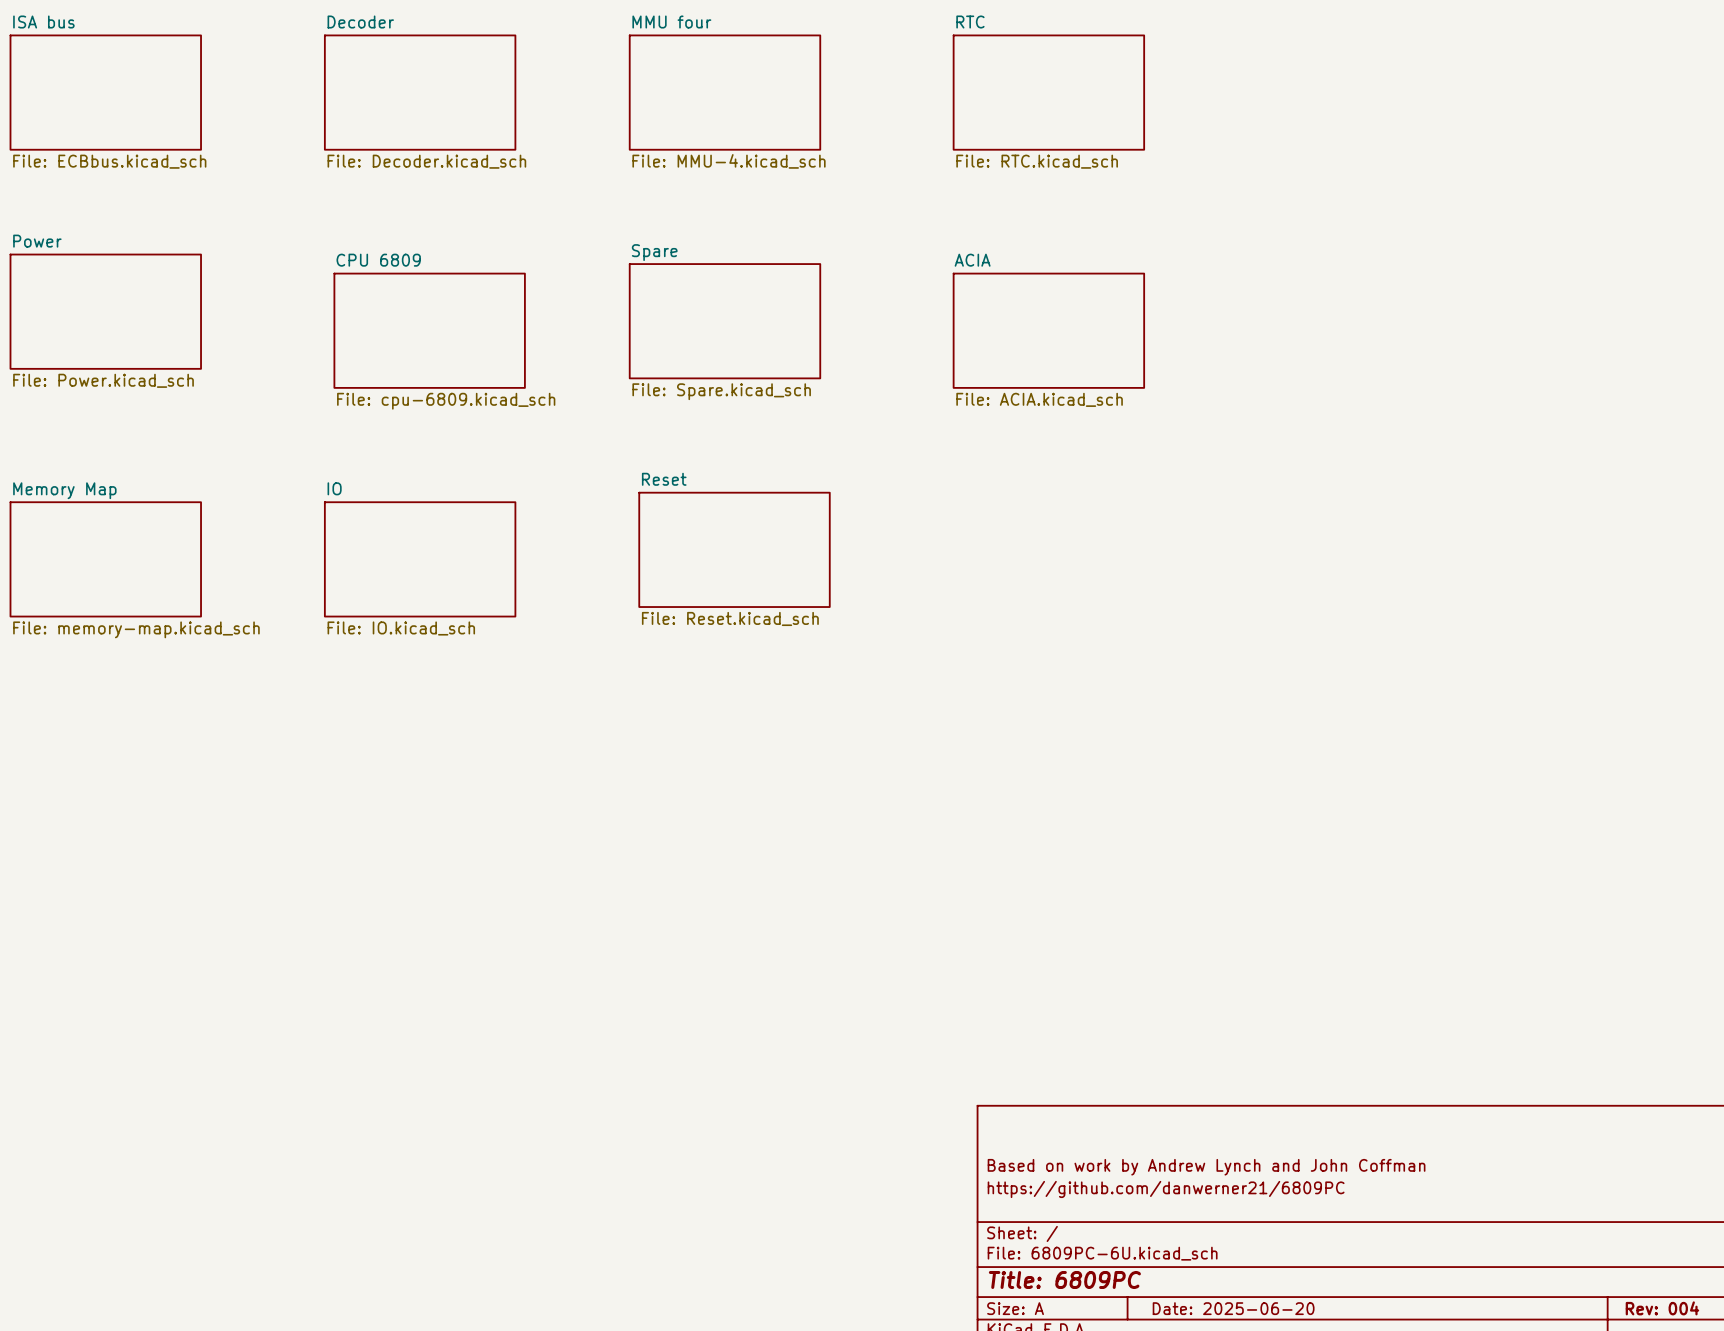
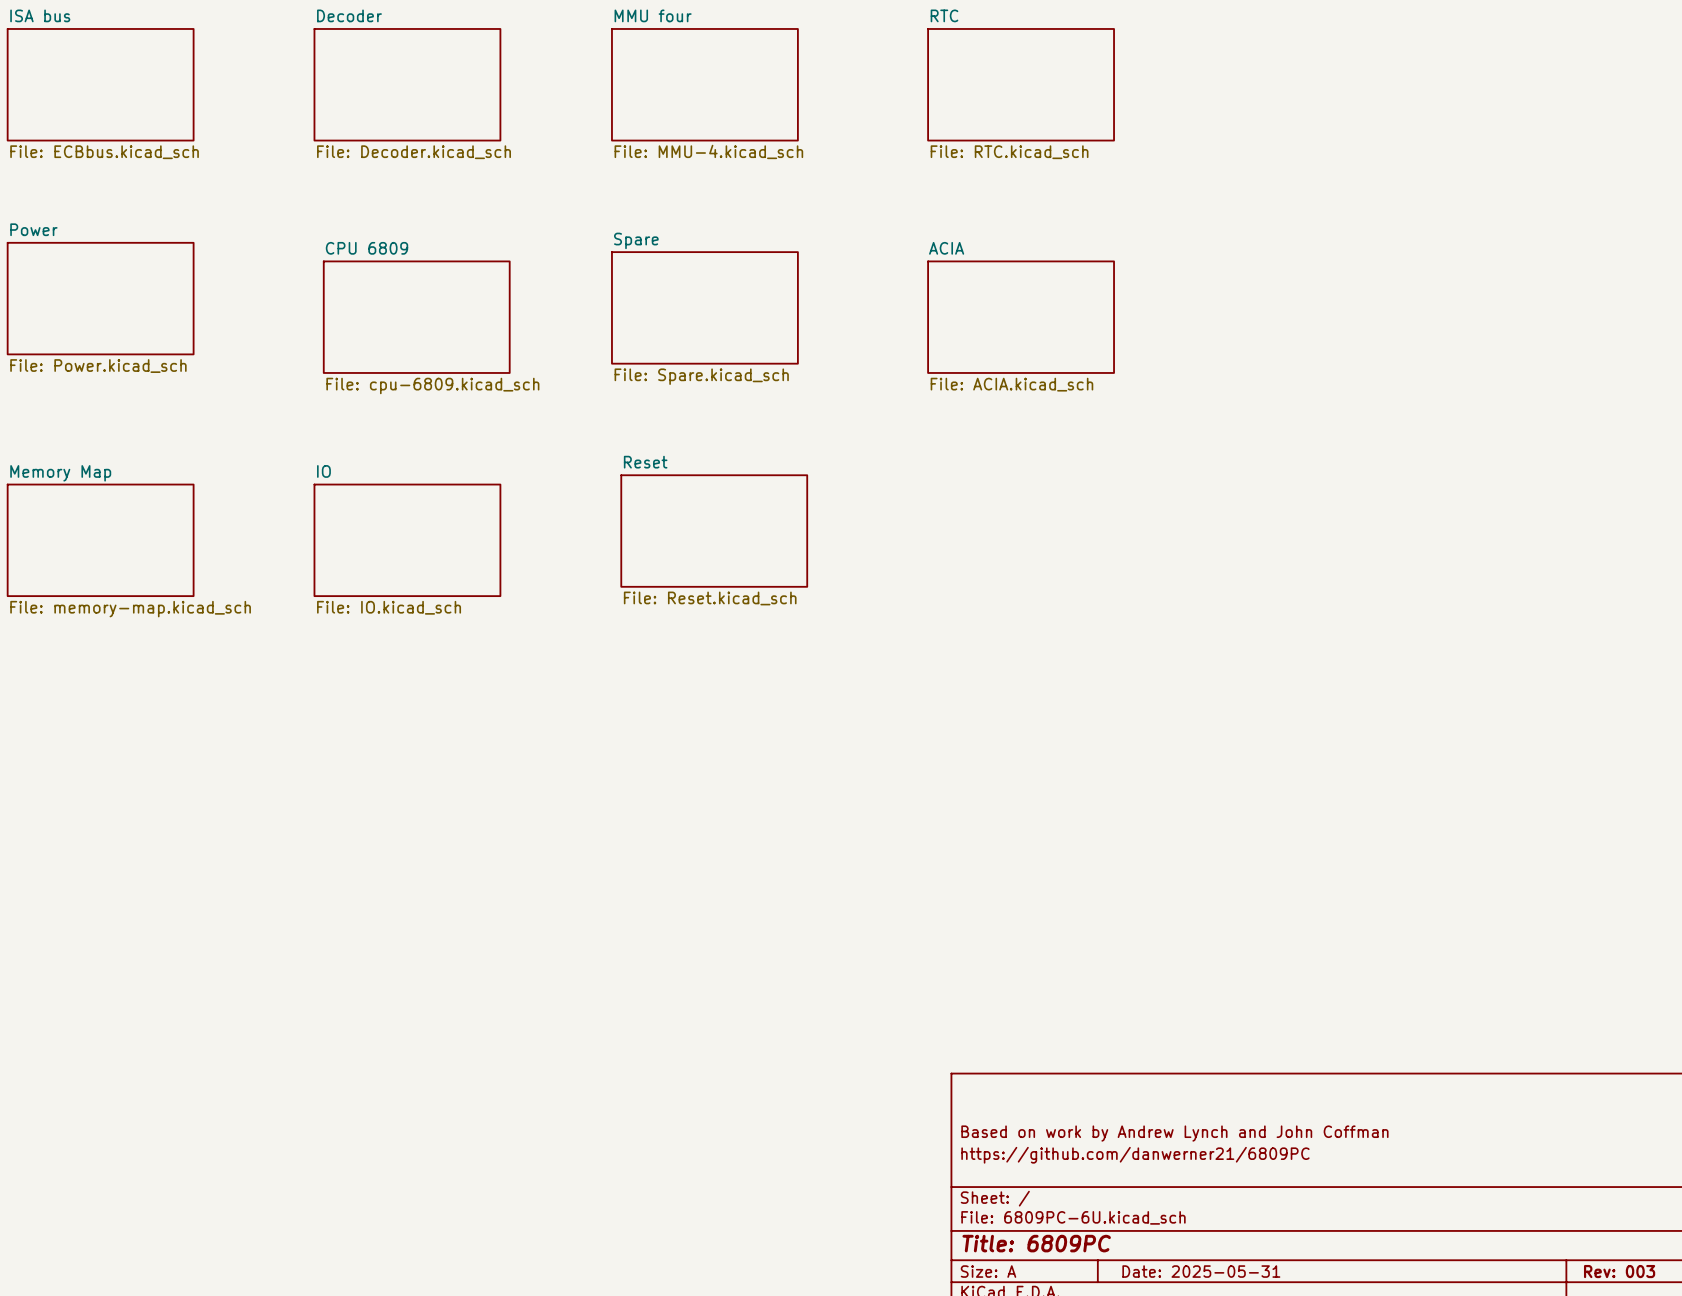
title block: Date: 2025-06-20 (1233, 1308) -> Date: 2025-05-31 (1201, 1271)
title block: Rev: 004 (1662, 1308) -> Rev: 003 (1619, 1271)

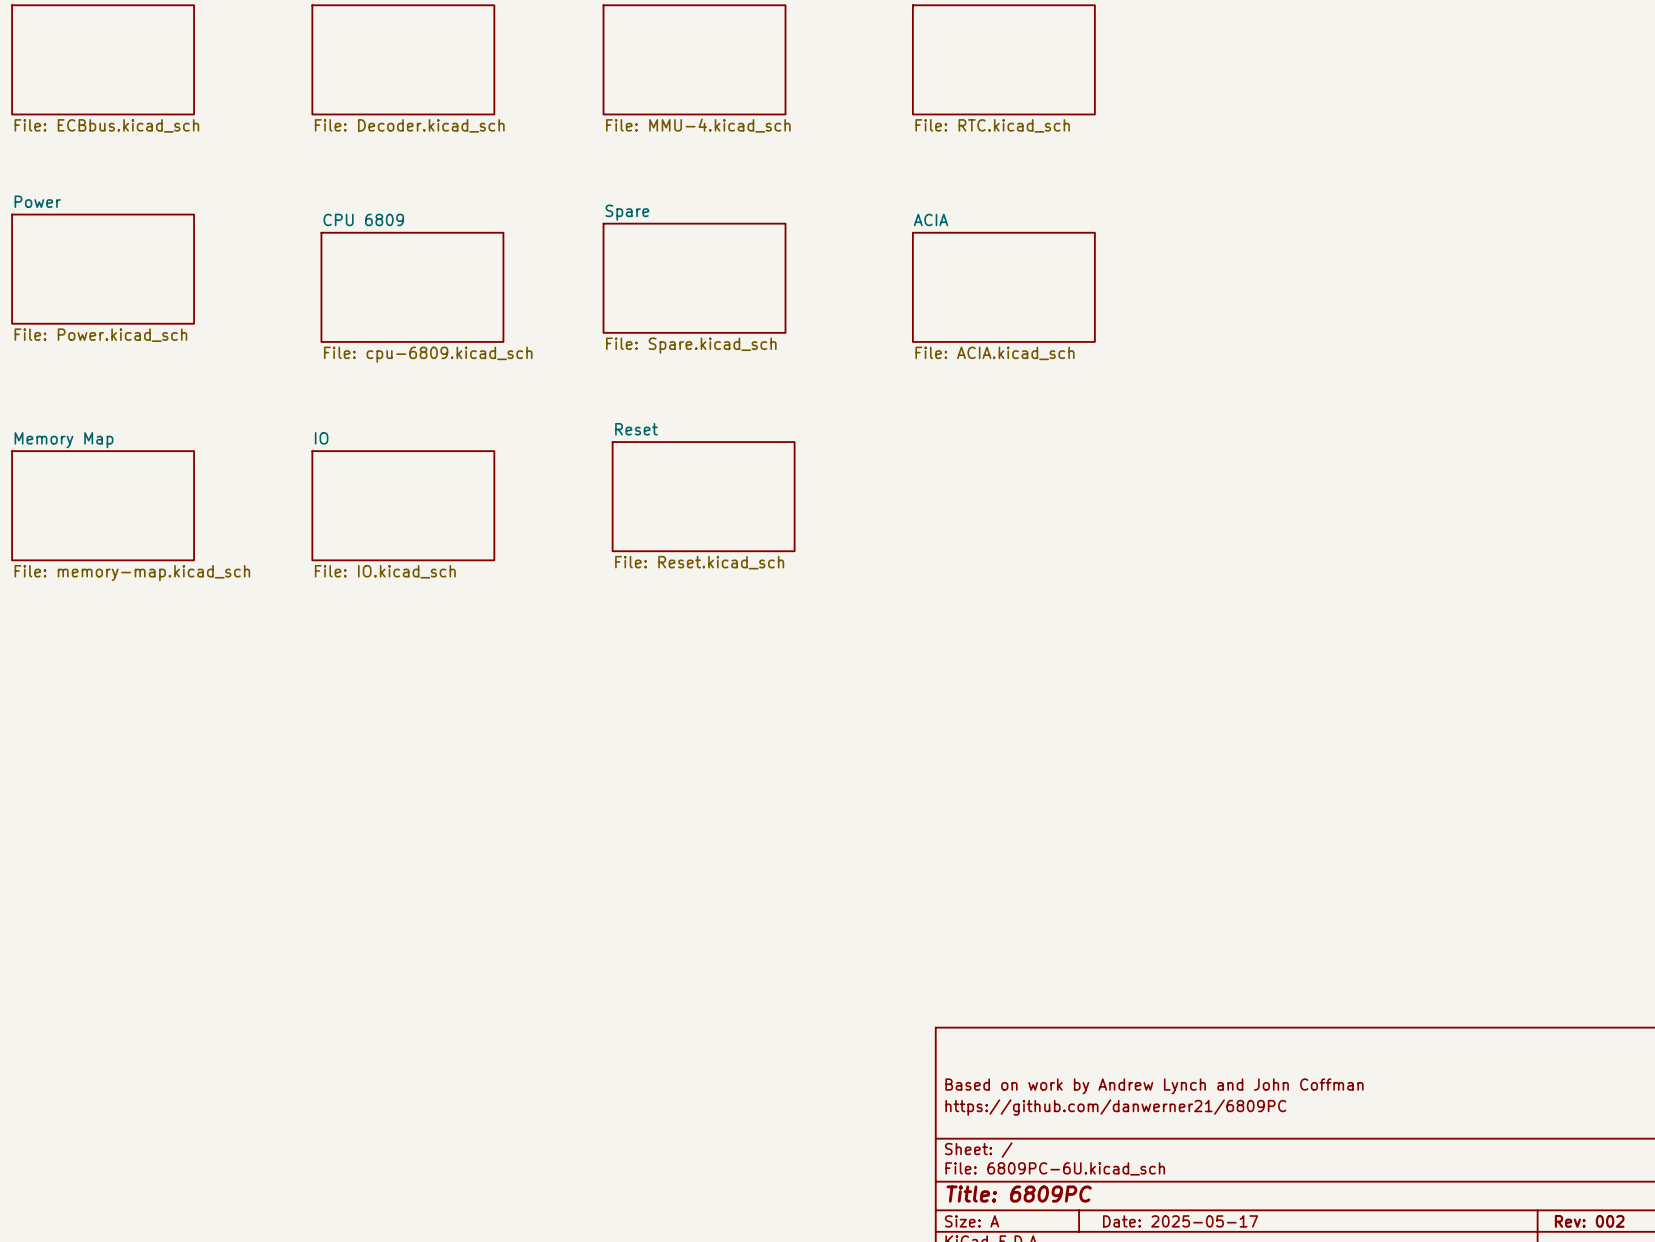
title block: Date: 2025-05-31 (1201, 1271) -> Date: 2025-05-17 (1180, 1221)
title block: Rev: 003 (1619, 1271) -> Rev: 002 (1589, 1221)

